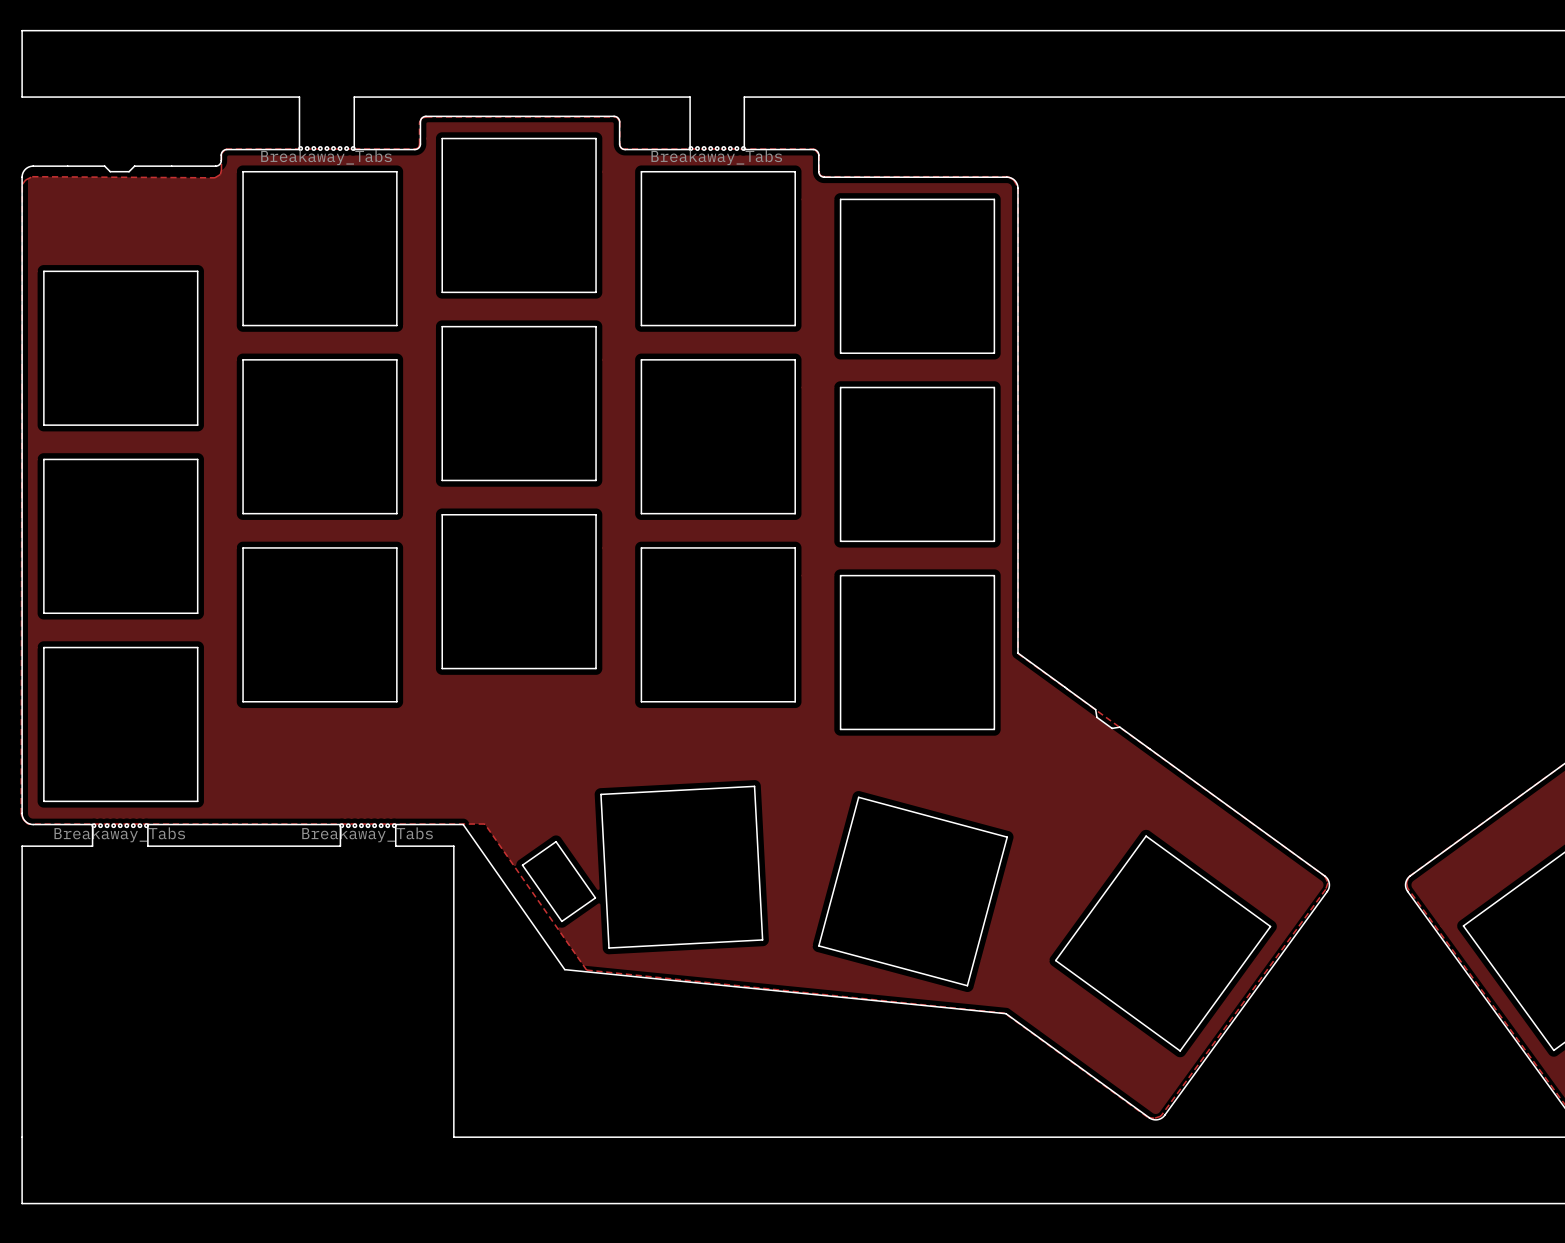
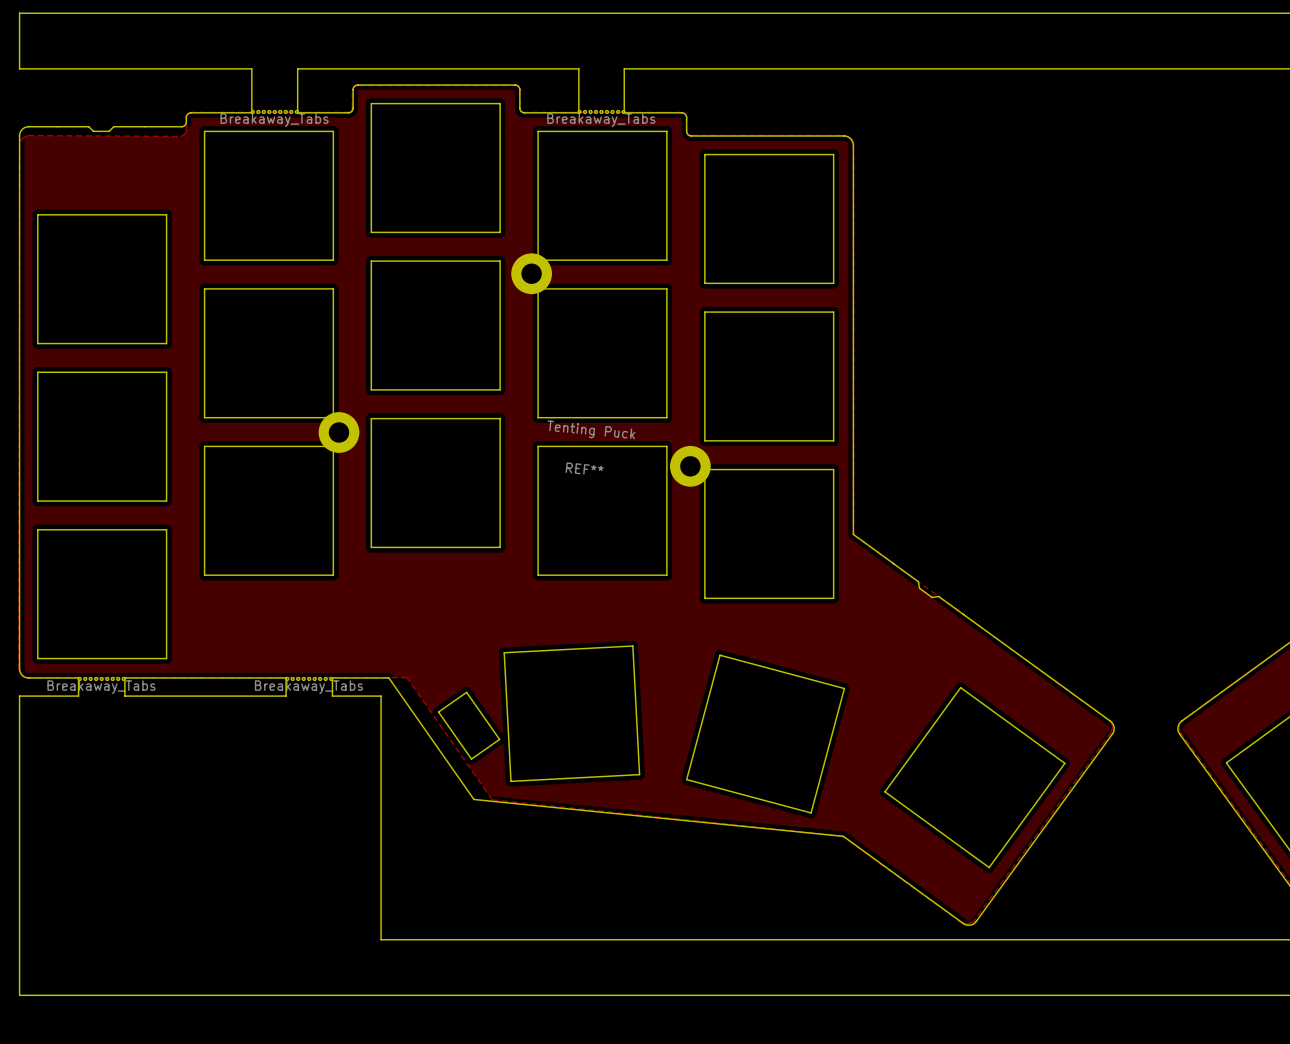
REF**: none -> Tenting Puck (514, 370)

